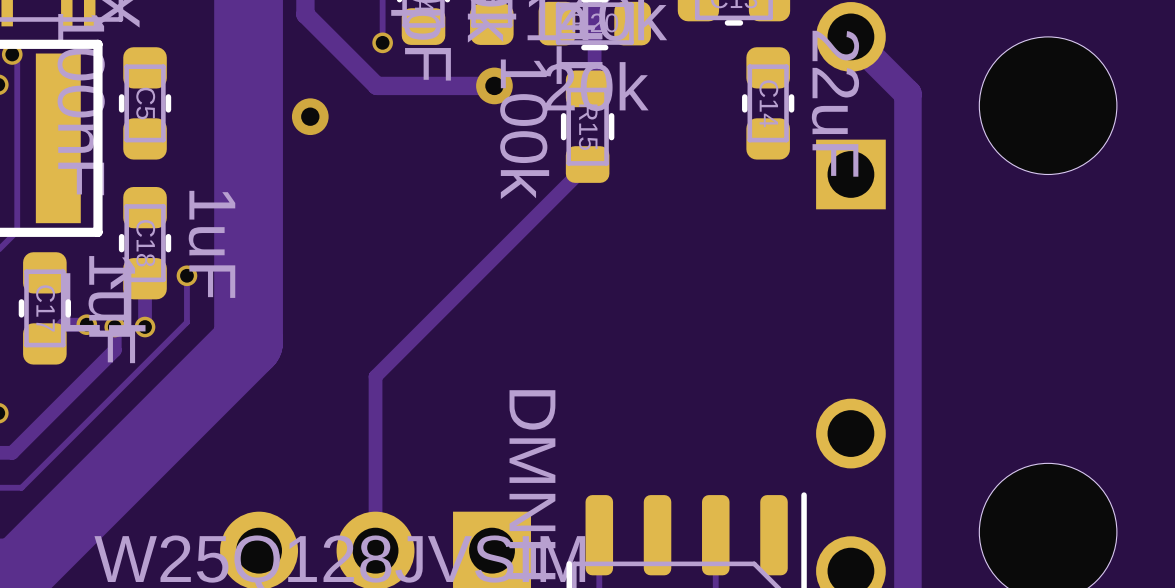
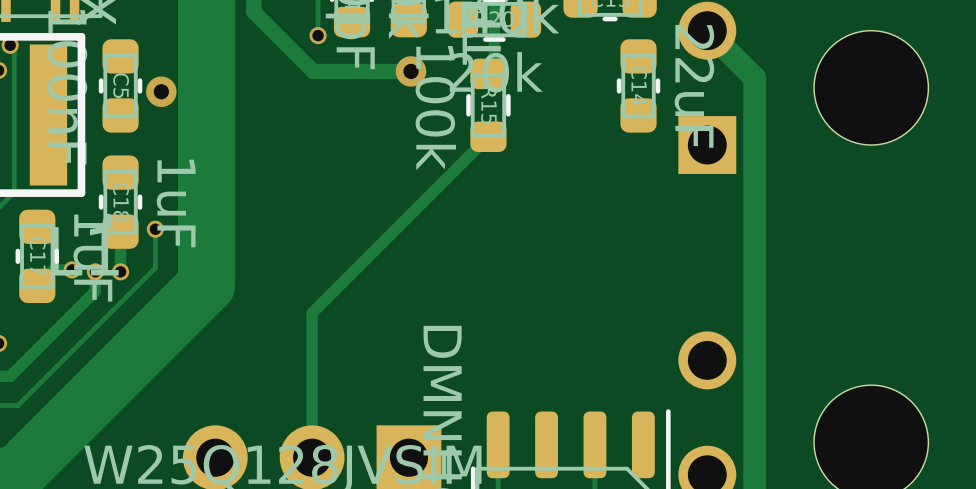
via position: (310, 116) -> (161, 91)

